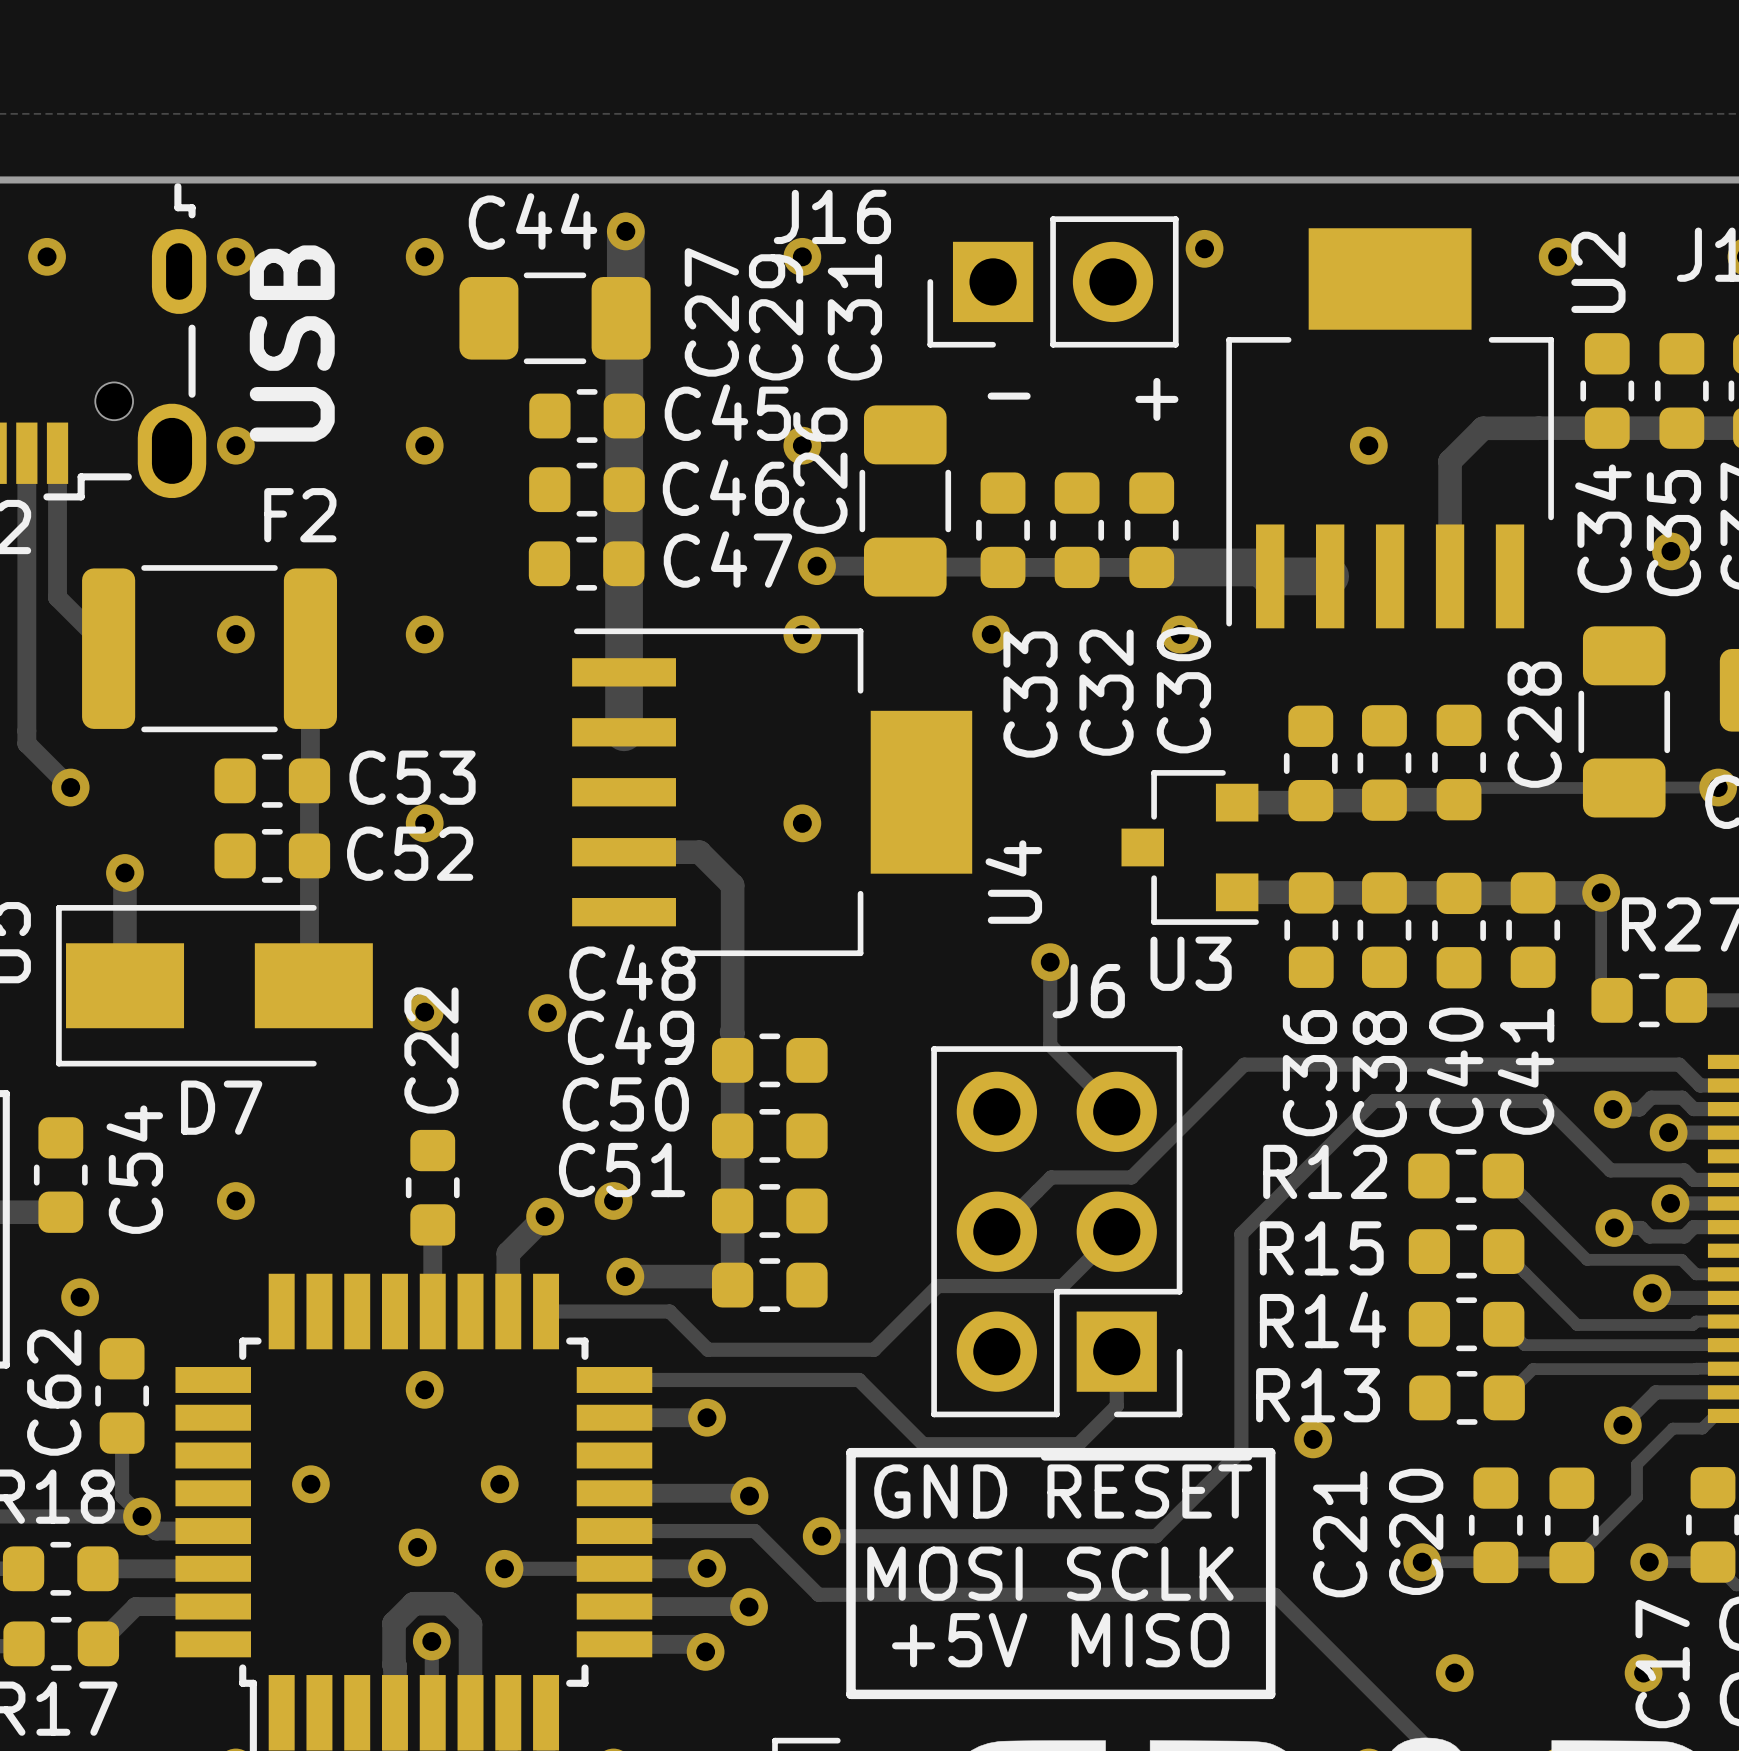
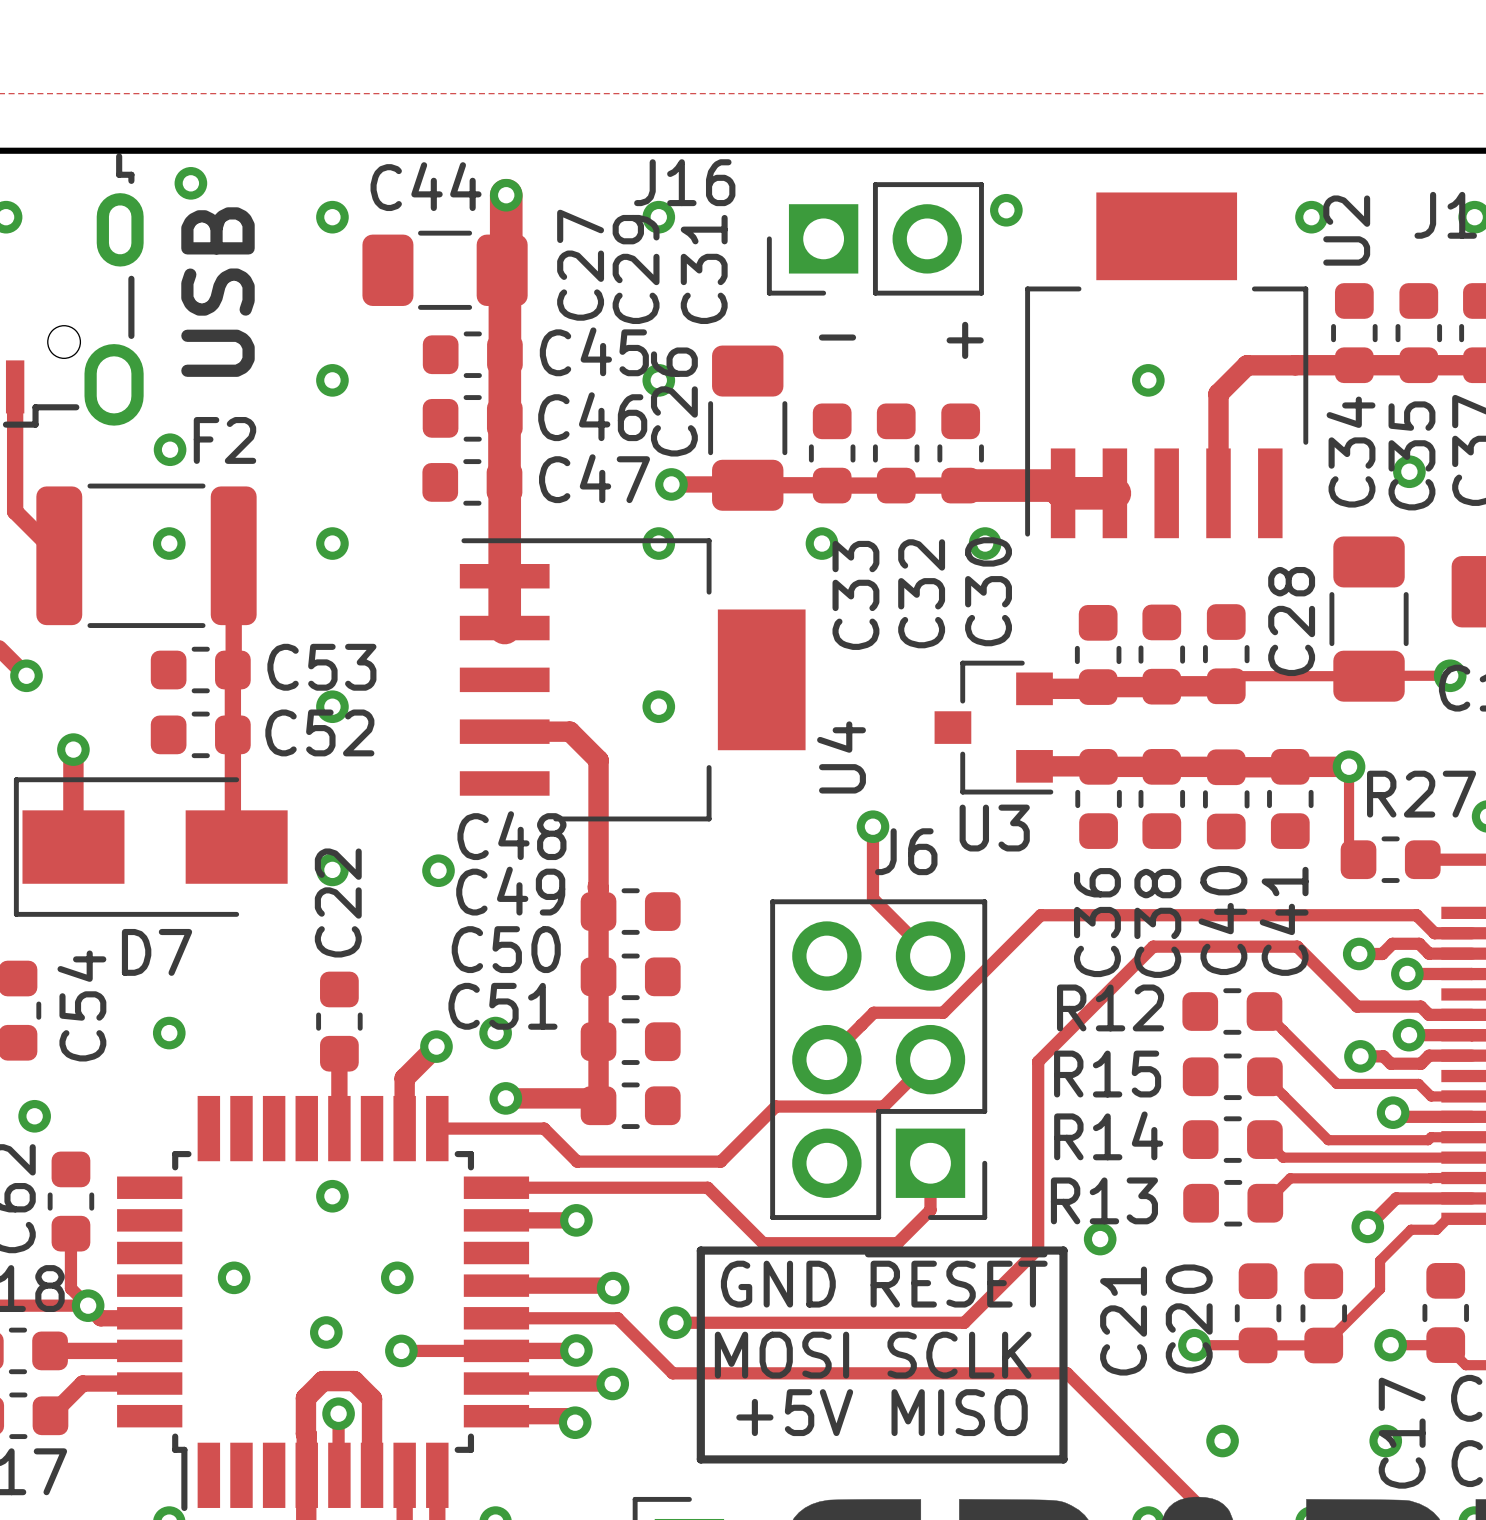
via position: (235, 256) -> (190, 183)
via position: (235, 445) -> (170, 449)

